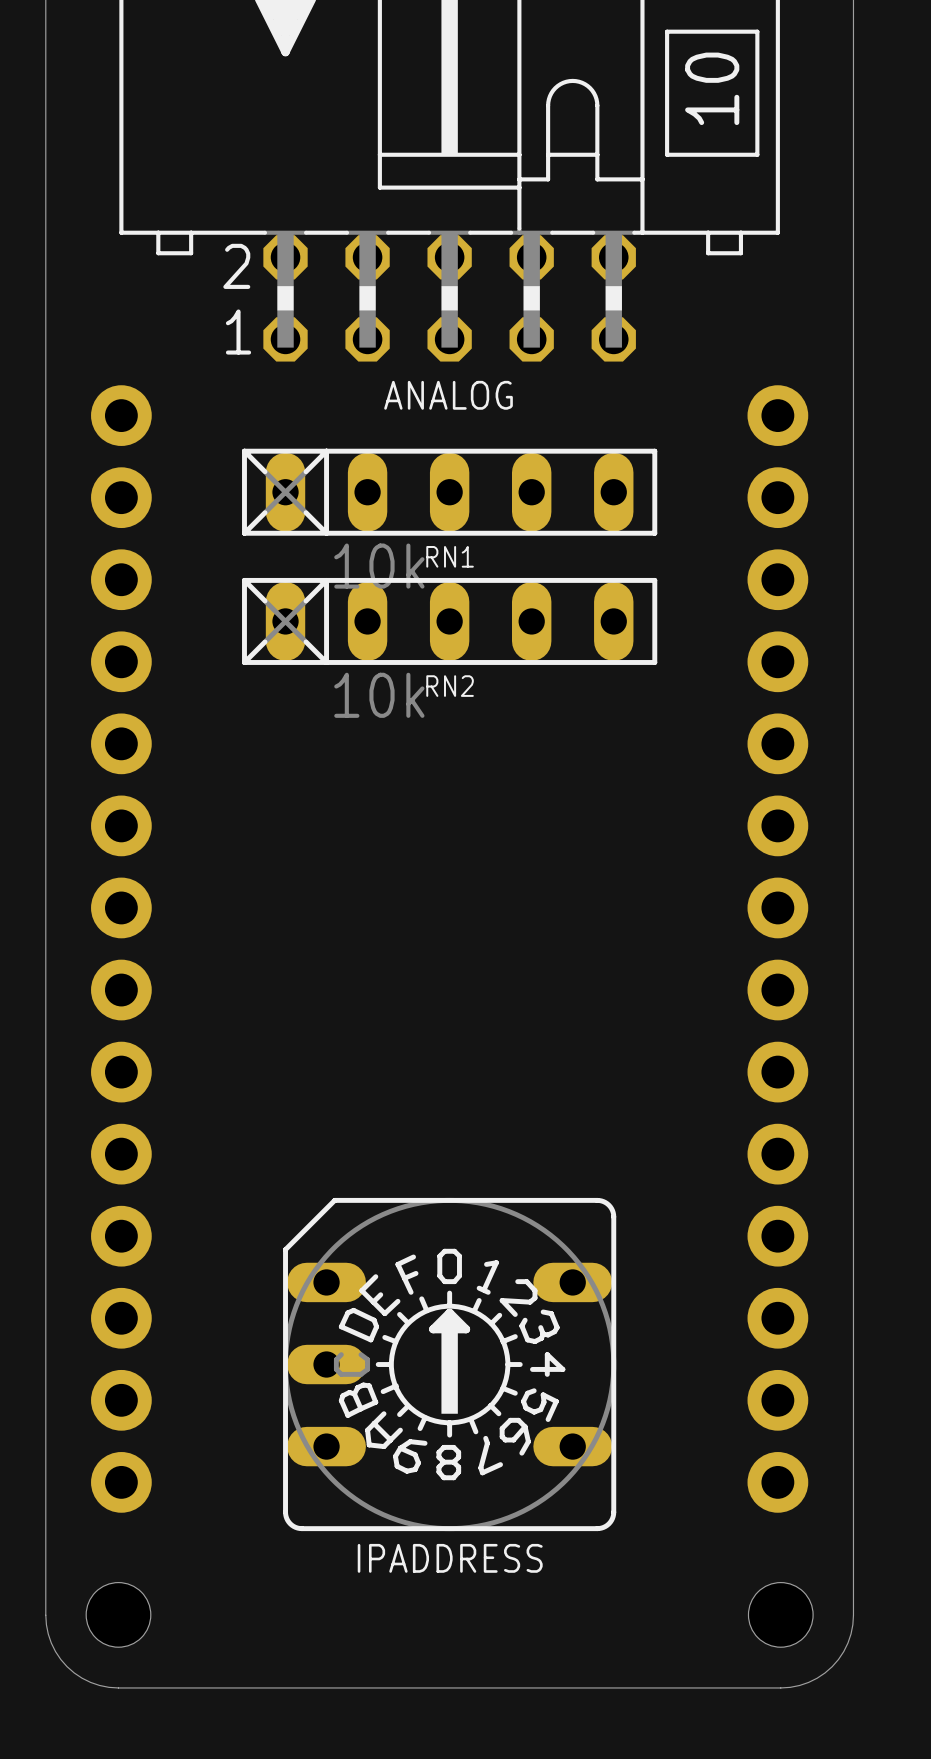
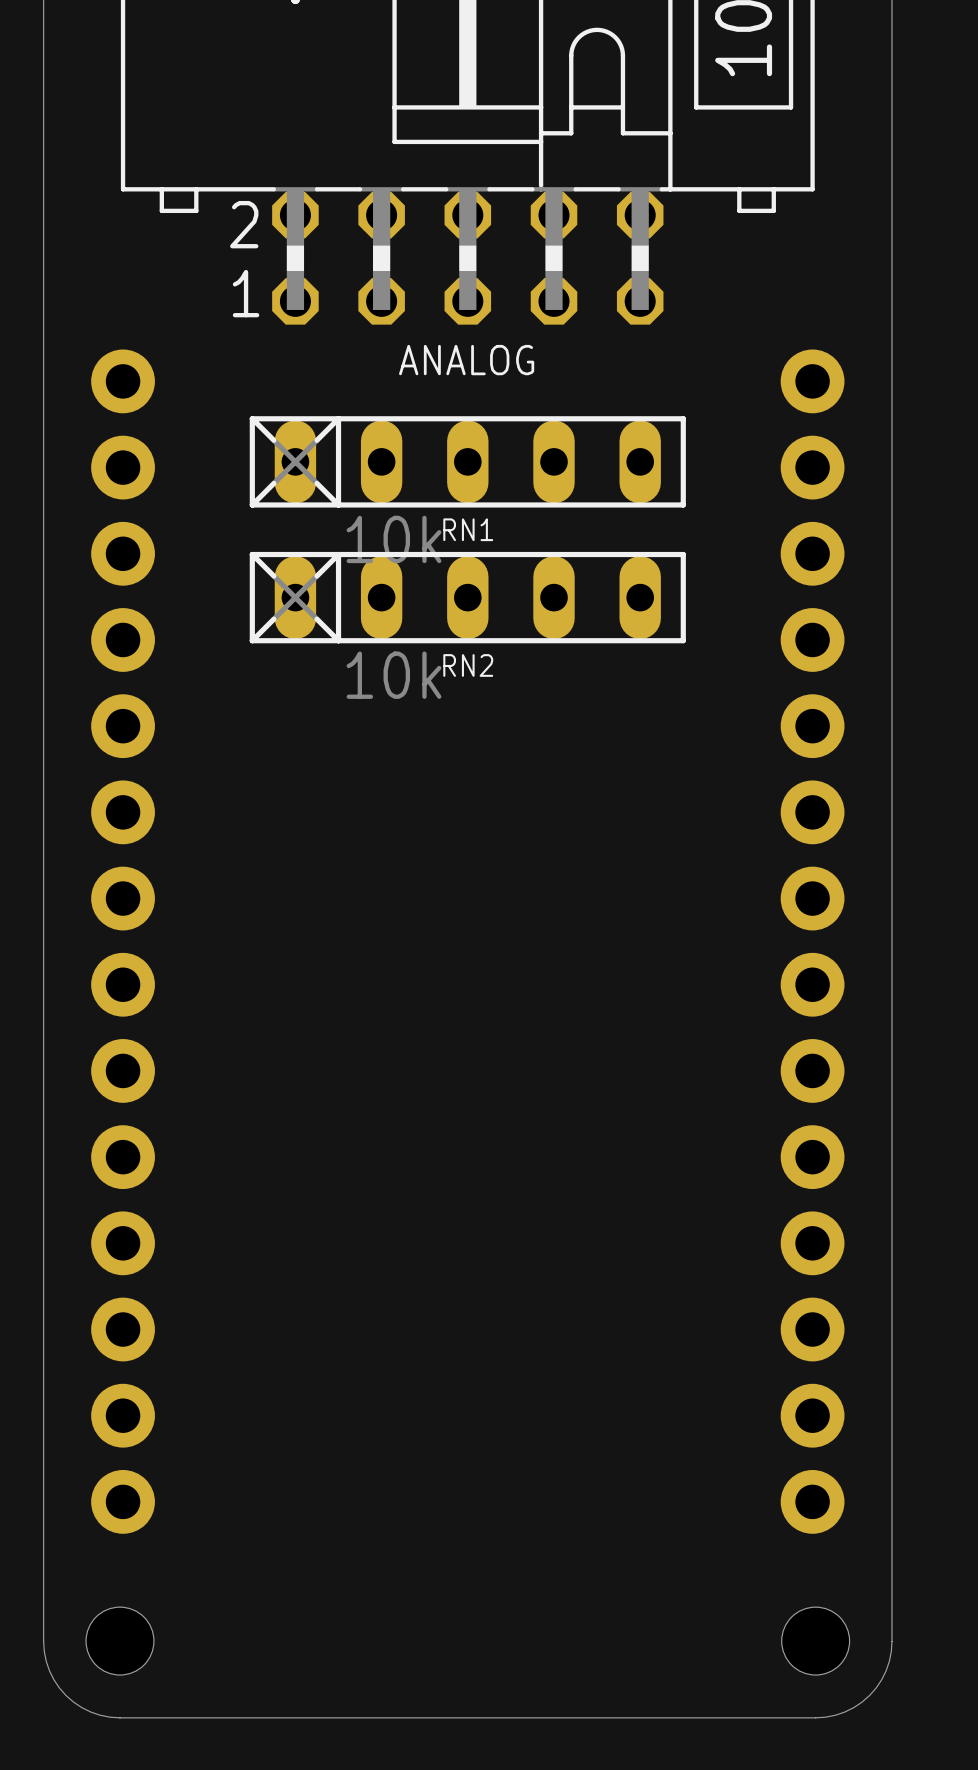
IPADDRESS: (449, 1364) -> none

